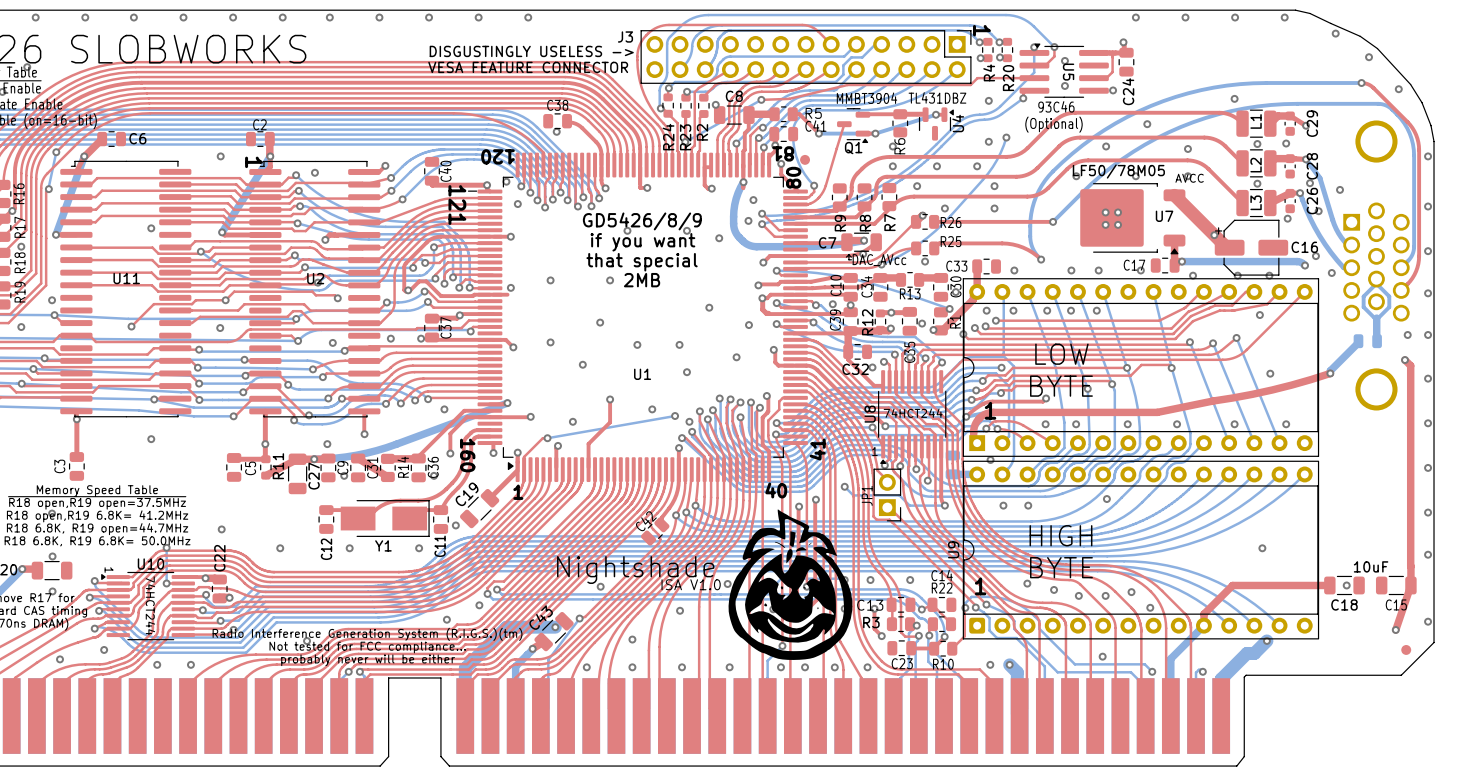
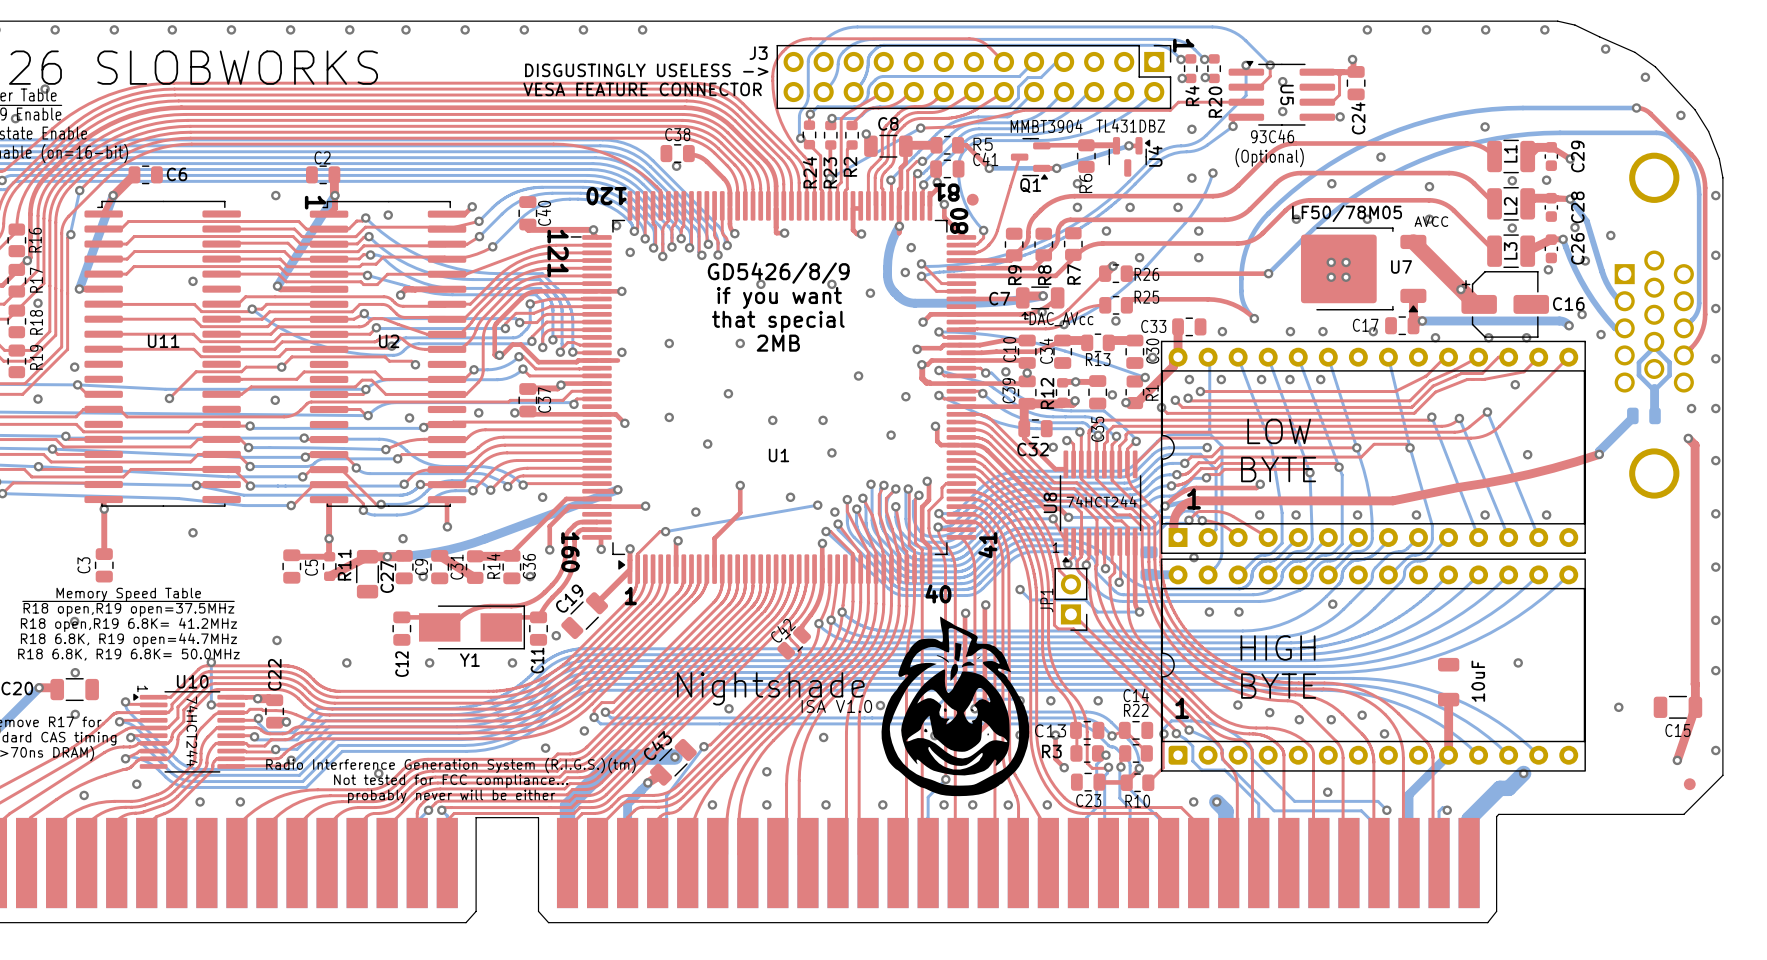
U9: (1140, 550) -> none
part: none -> (1373, 665)
text rotation: 0° (1371, 566) -> 90° counterclockwise (1478, 681)
text position: 10uF (1371, 566) -> 10uF (1478, 681)
top track: (1329, 585) (1232, 585) (1204, 614) -> (1448, 699) (1448, 741)
C18: (1344, 585) -> none

